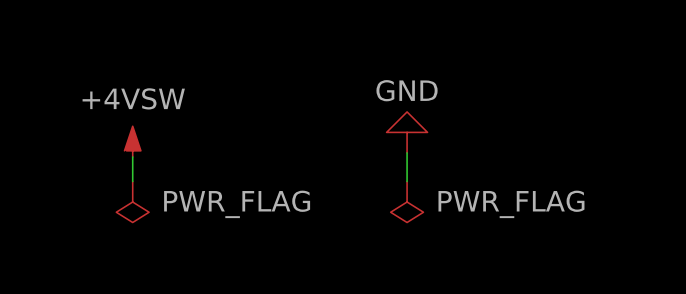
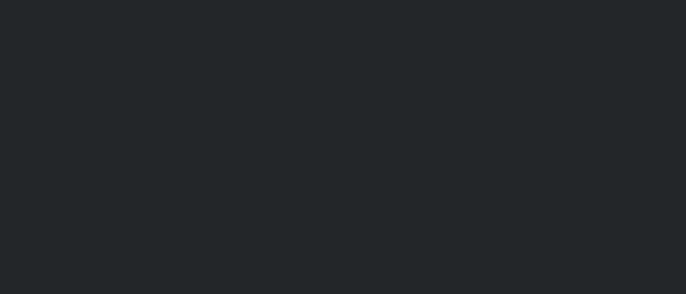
power symbol: GND (407, 132) -> none
power symbol: +4VSW (132, 141) -> none
wire: (407, 152) (407, 181) -> none
wire: (132, 156) (132, 181) -> none
power symbol: PWR_FLAG (132, 202) -> none
power symbol: PWR_FLAG (407, 202) -> none

